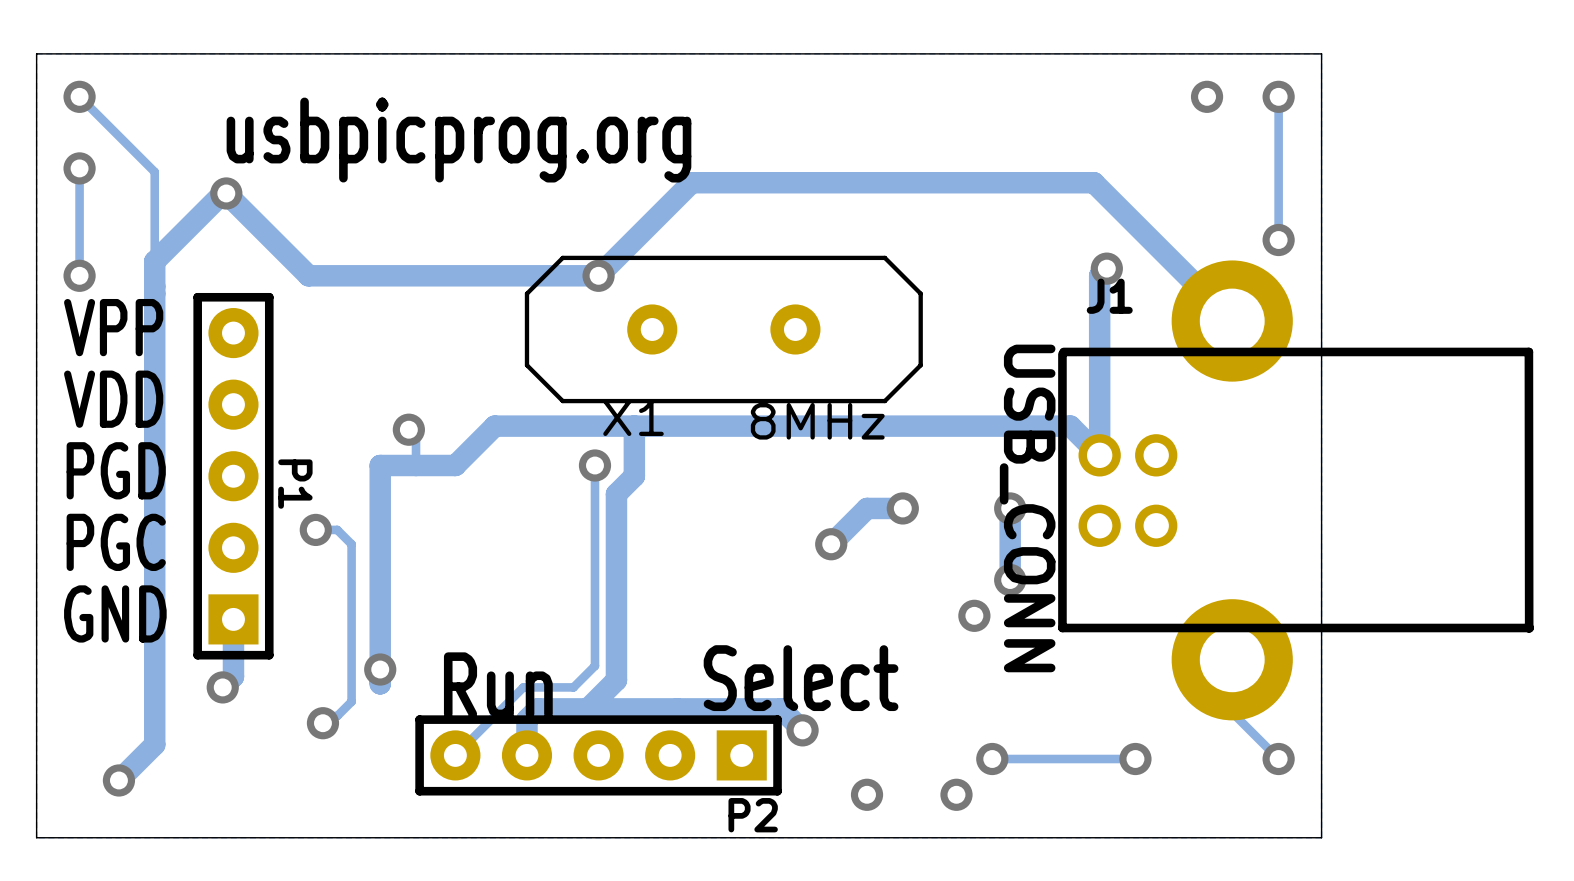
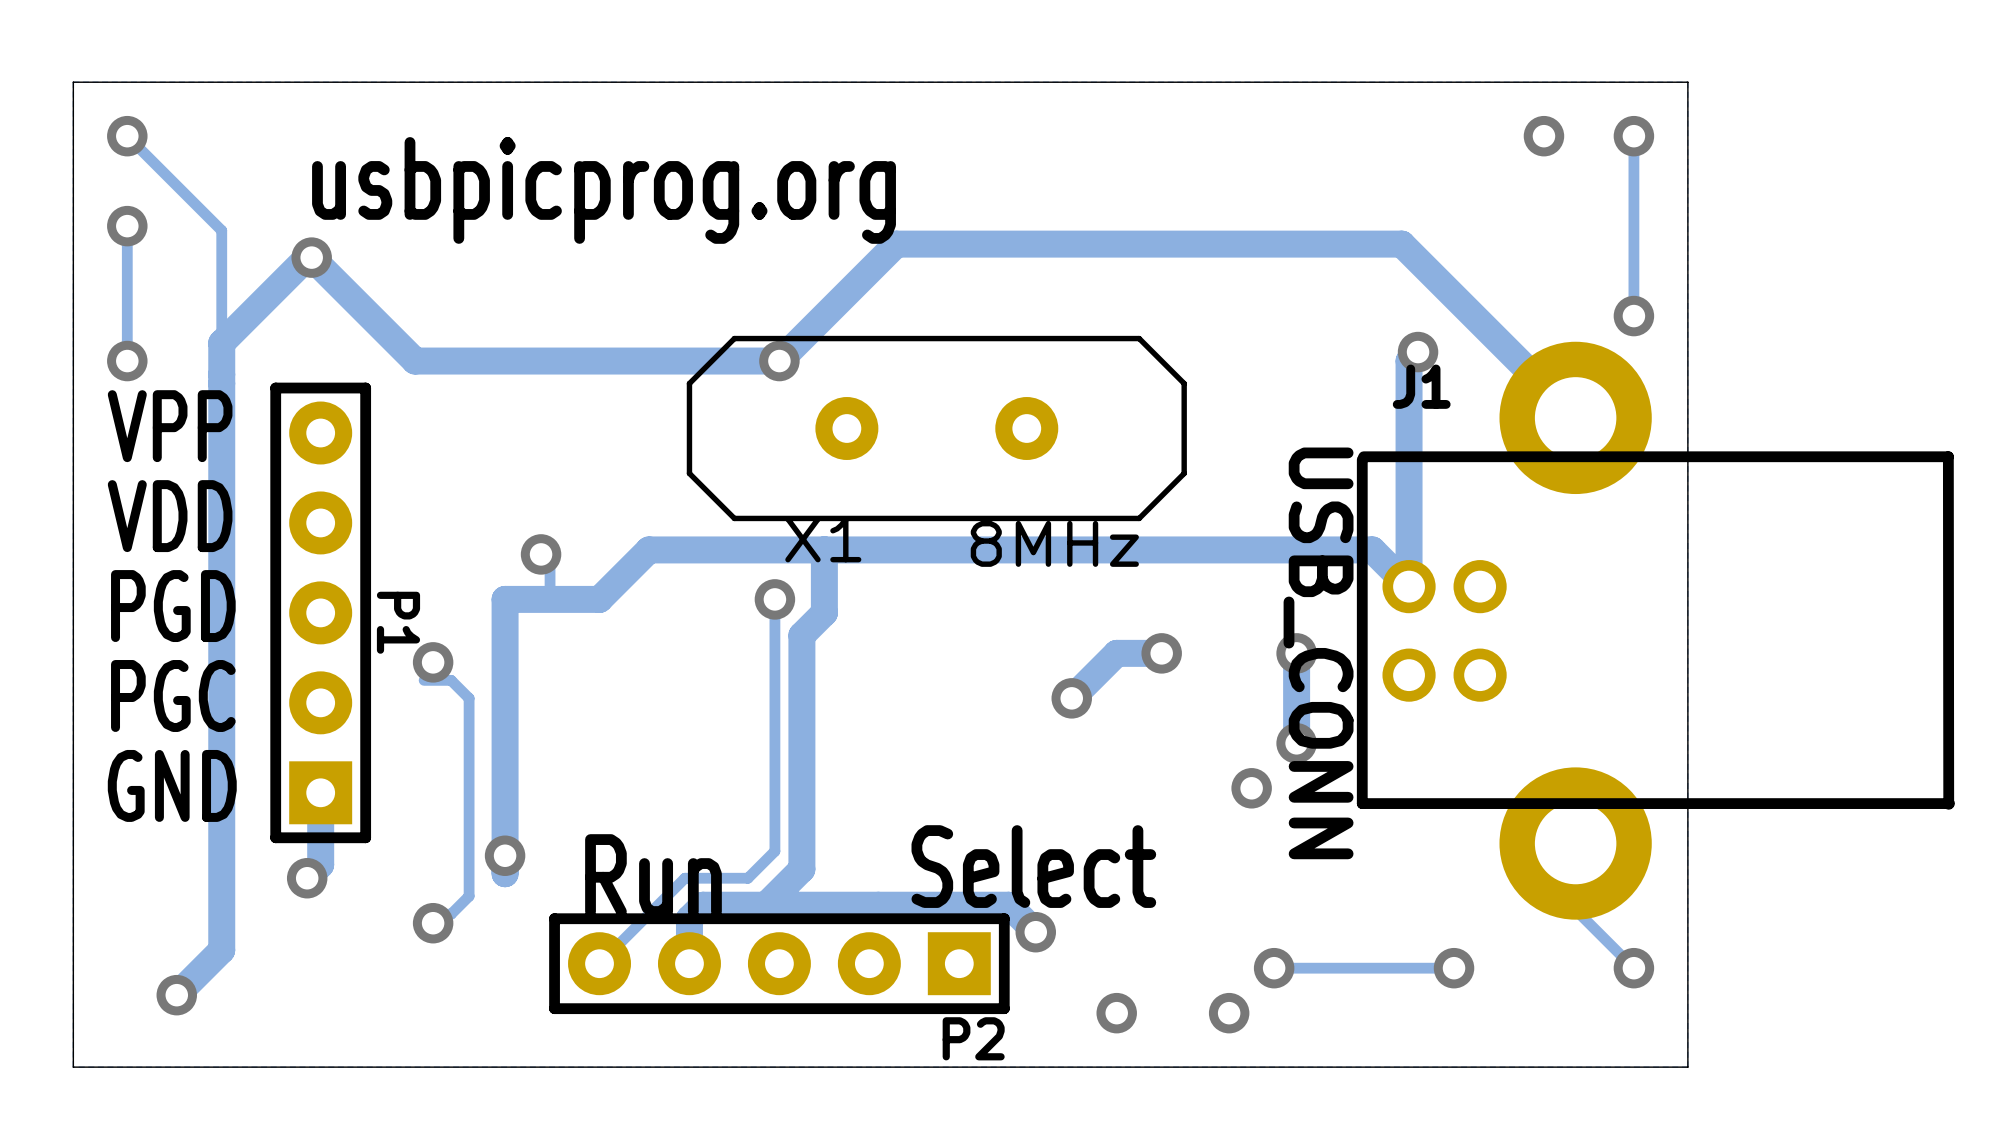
via position: (315, 529) -> (433, 662)

